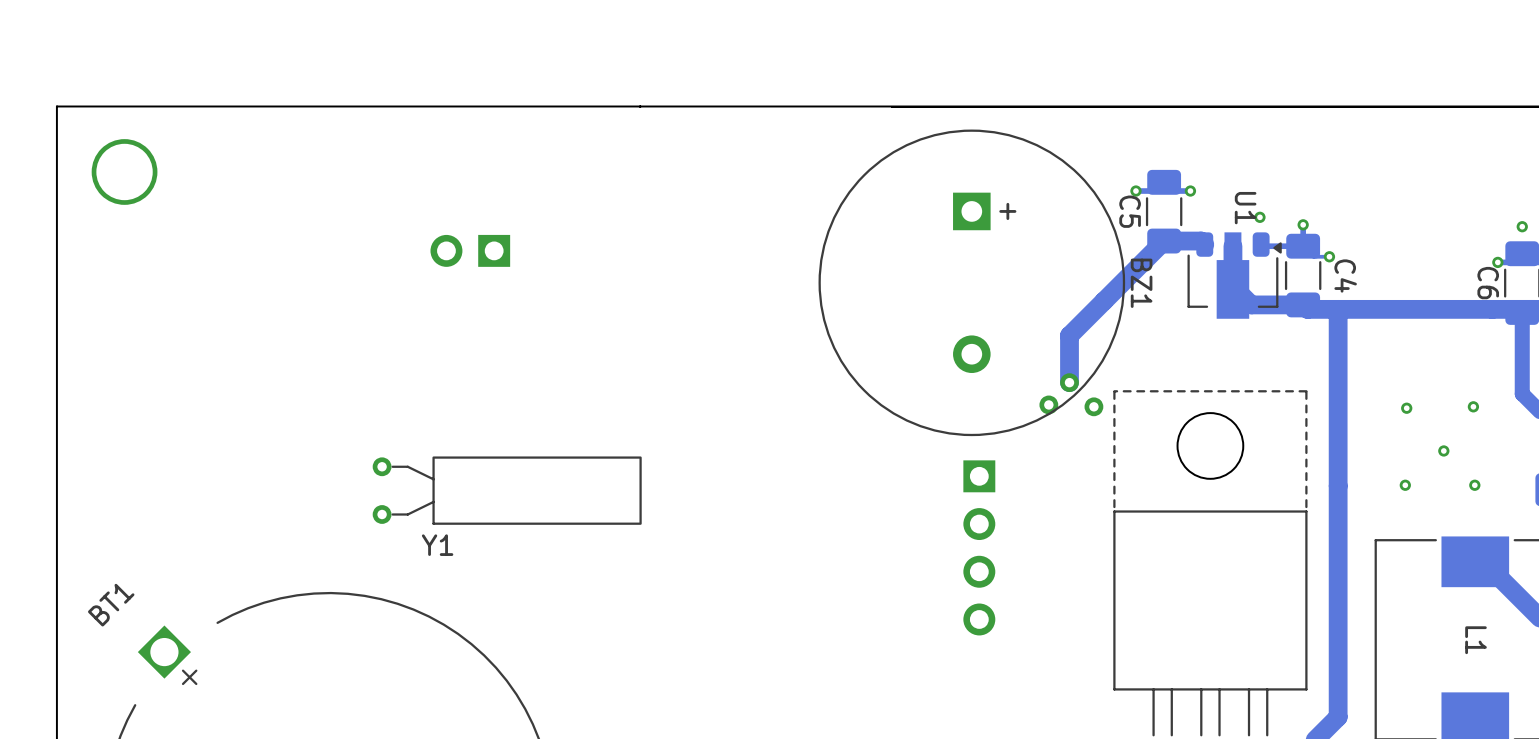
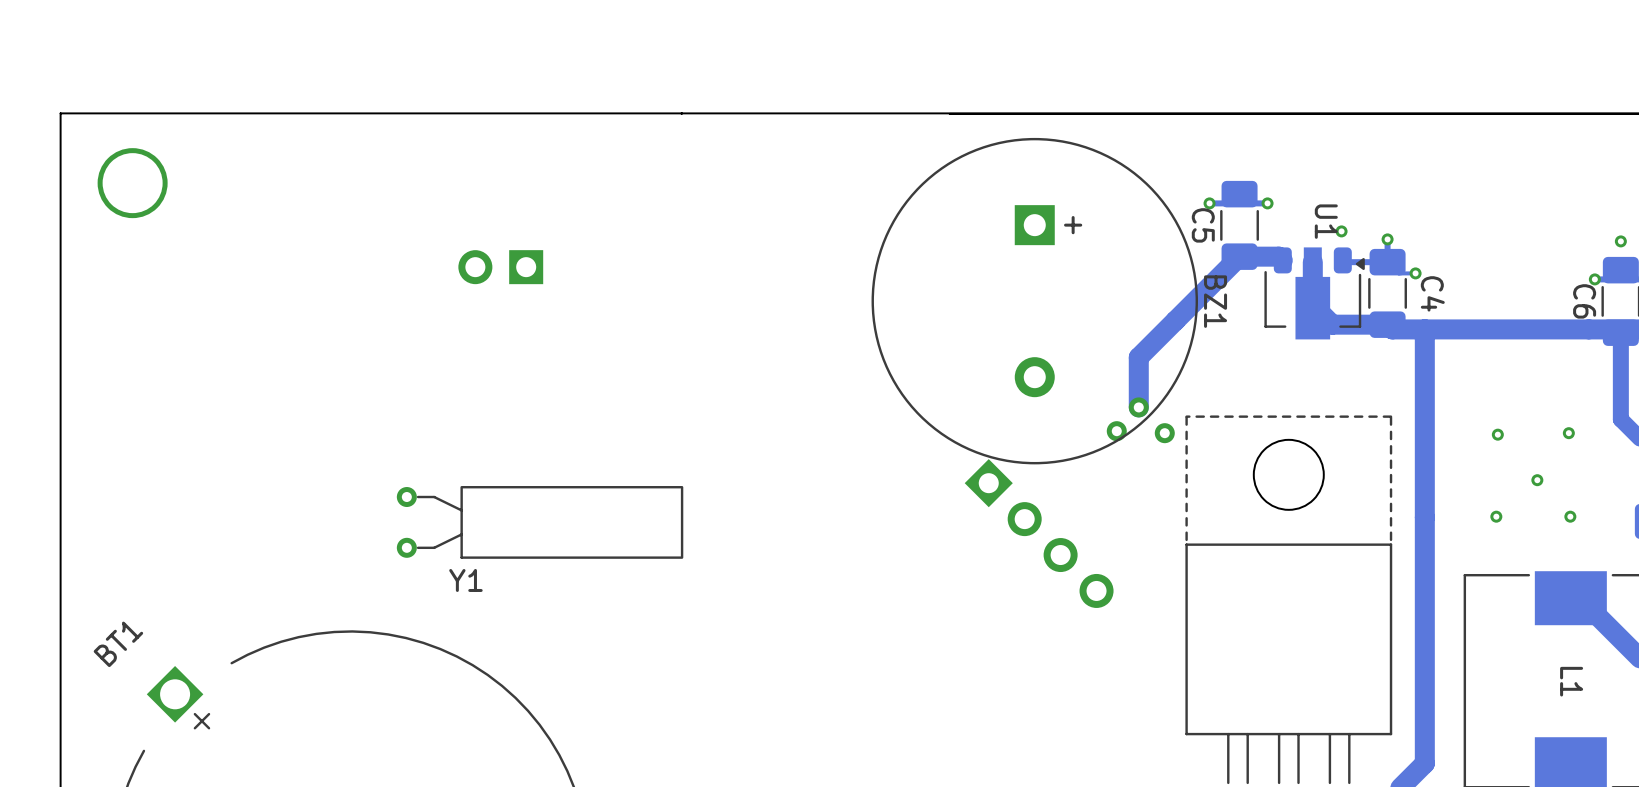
part: none -> (1039, 533)
part: (979, 547) -> none

